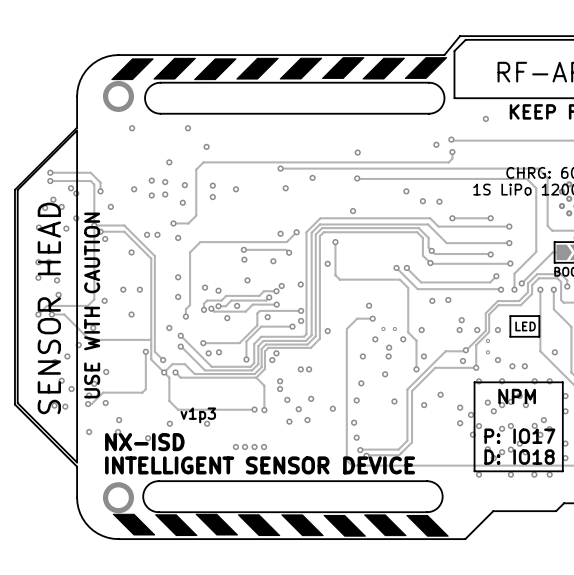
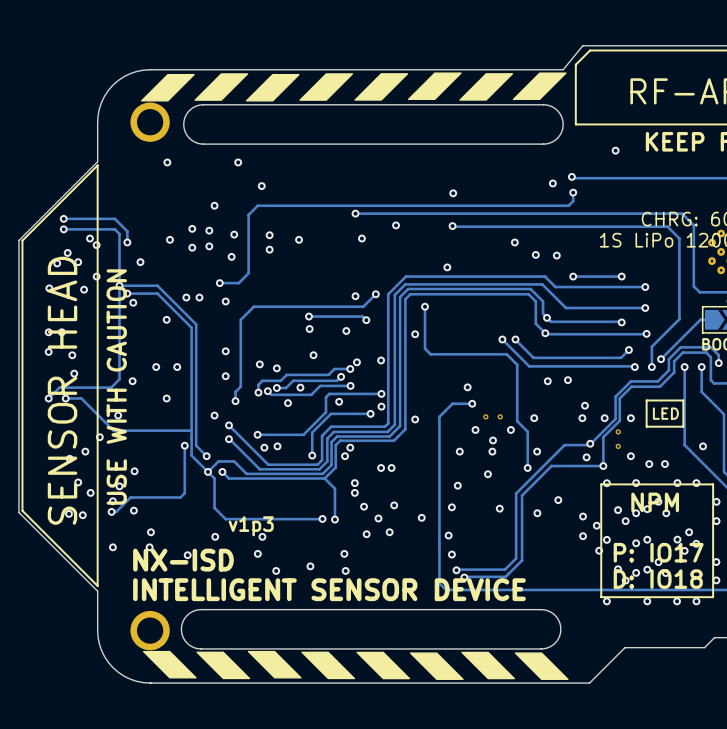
via: none -> (257, 553)
via: none -> (344, 553)
via: (235, 447) -> none
via: (254, 447) -> none
via: (264, 447) -> none
via: none -> (276, 570)
via: none -> (345, 570)

